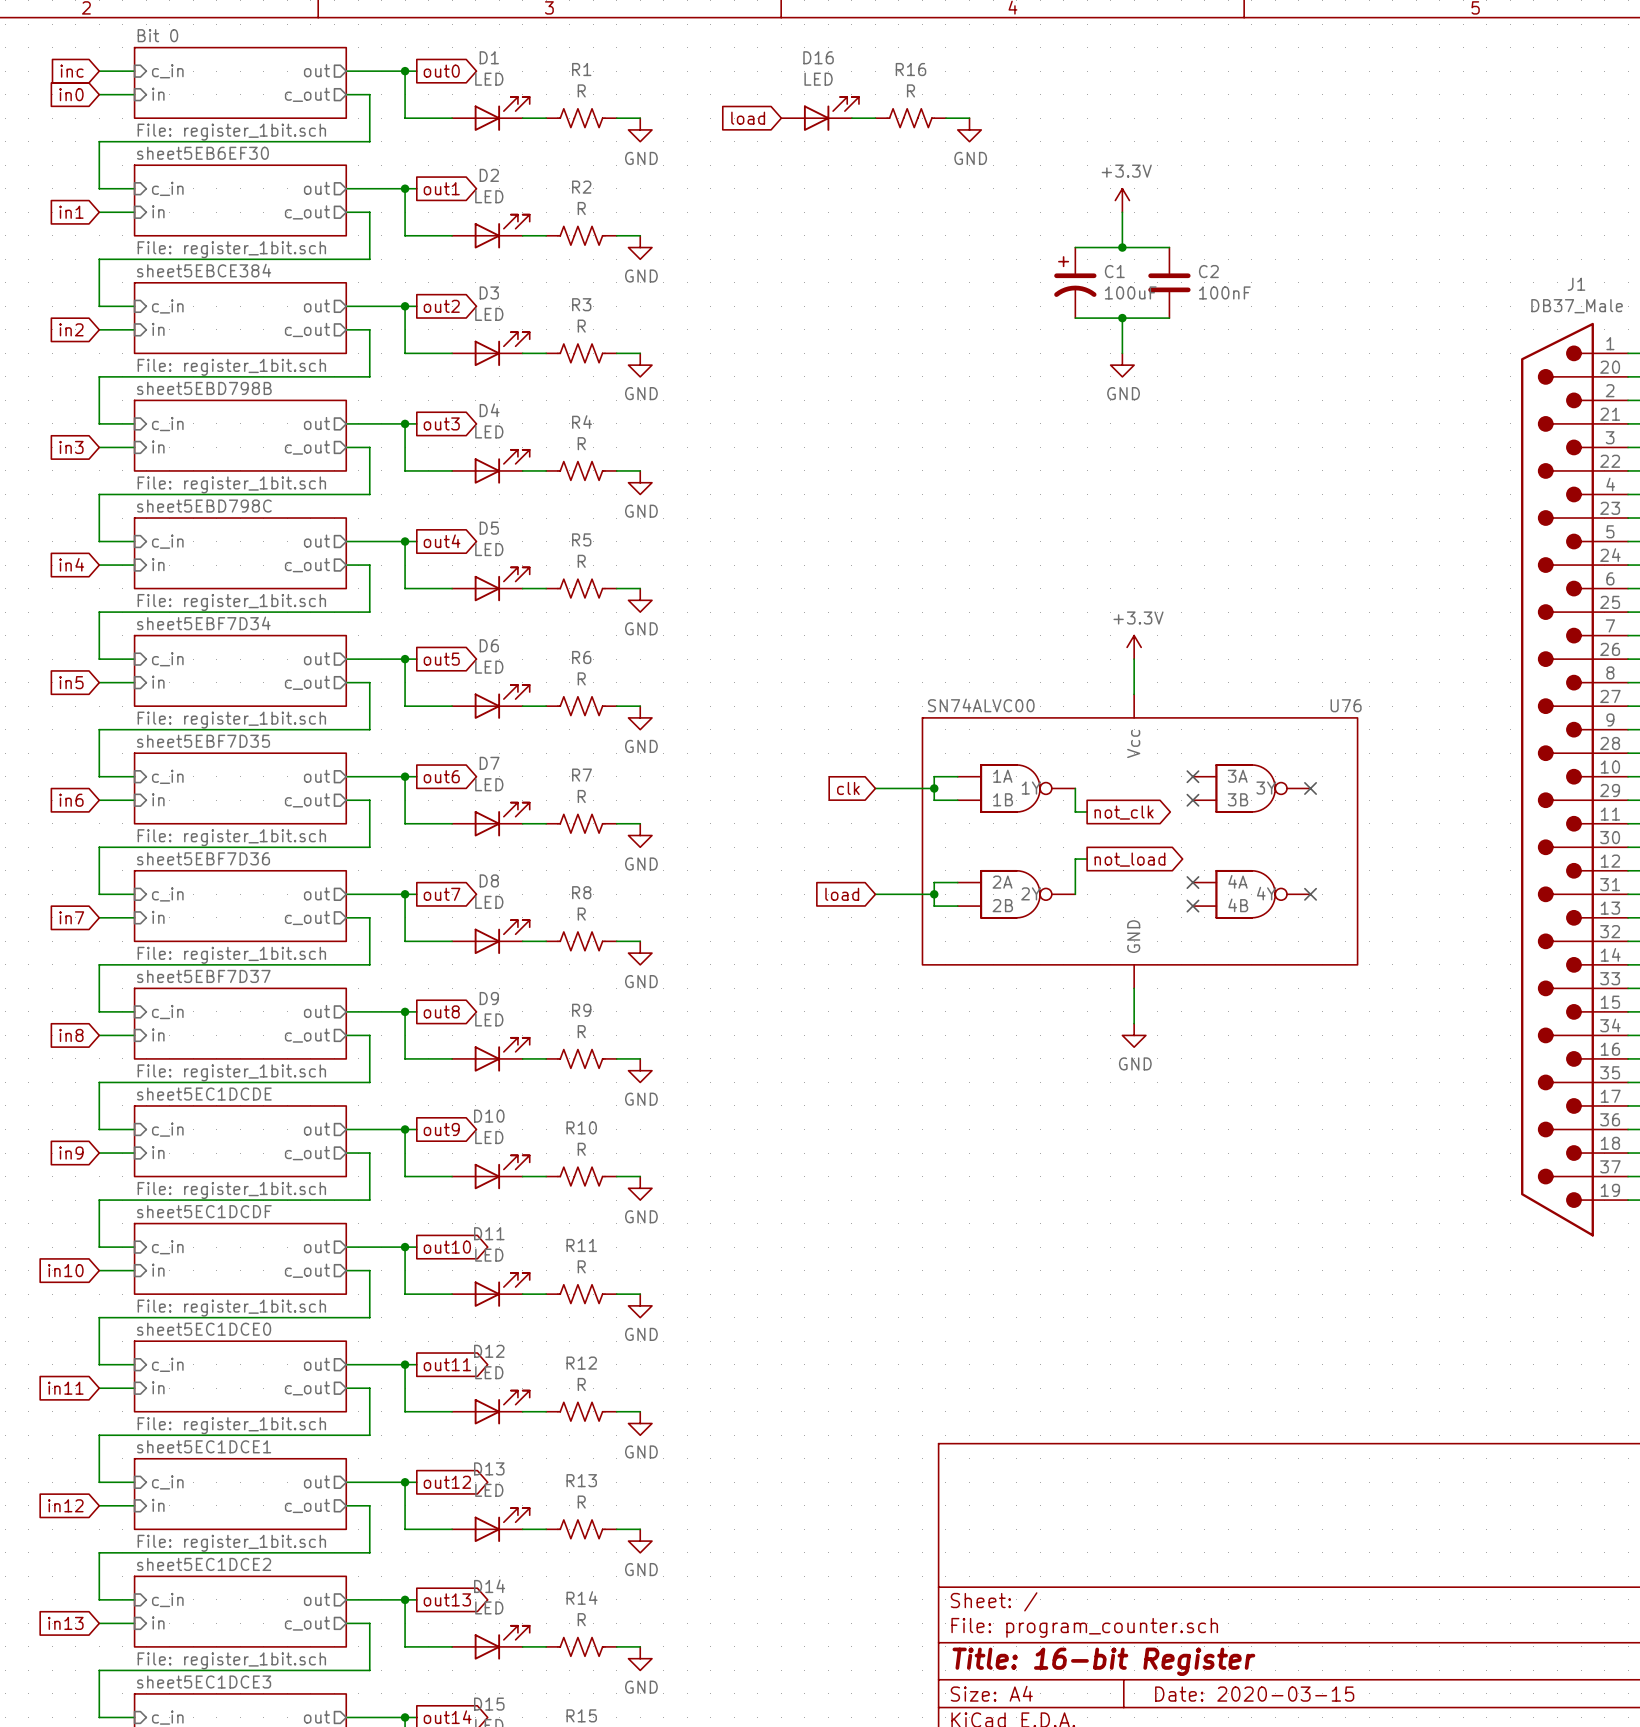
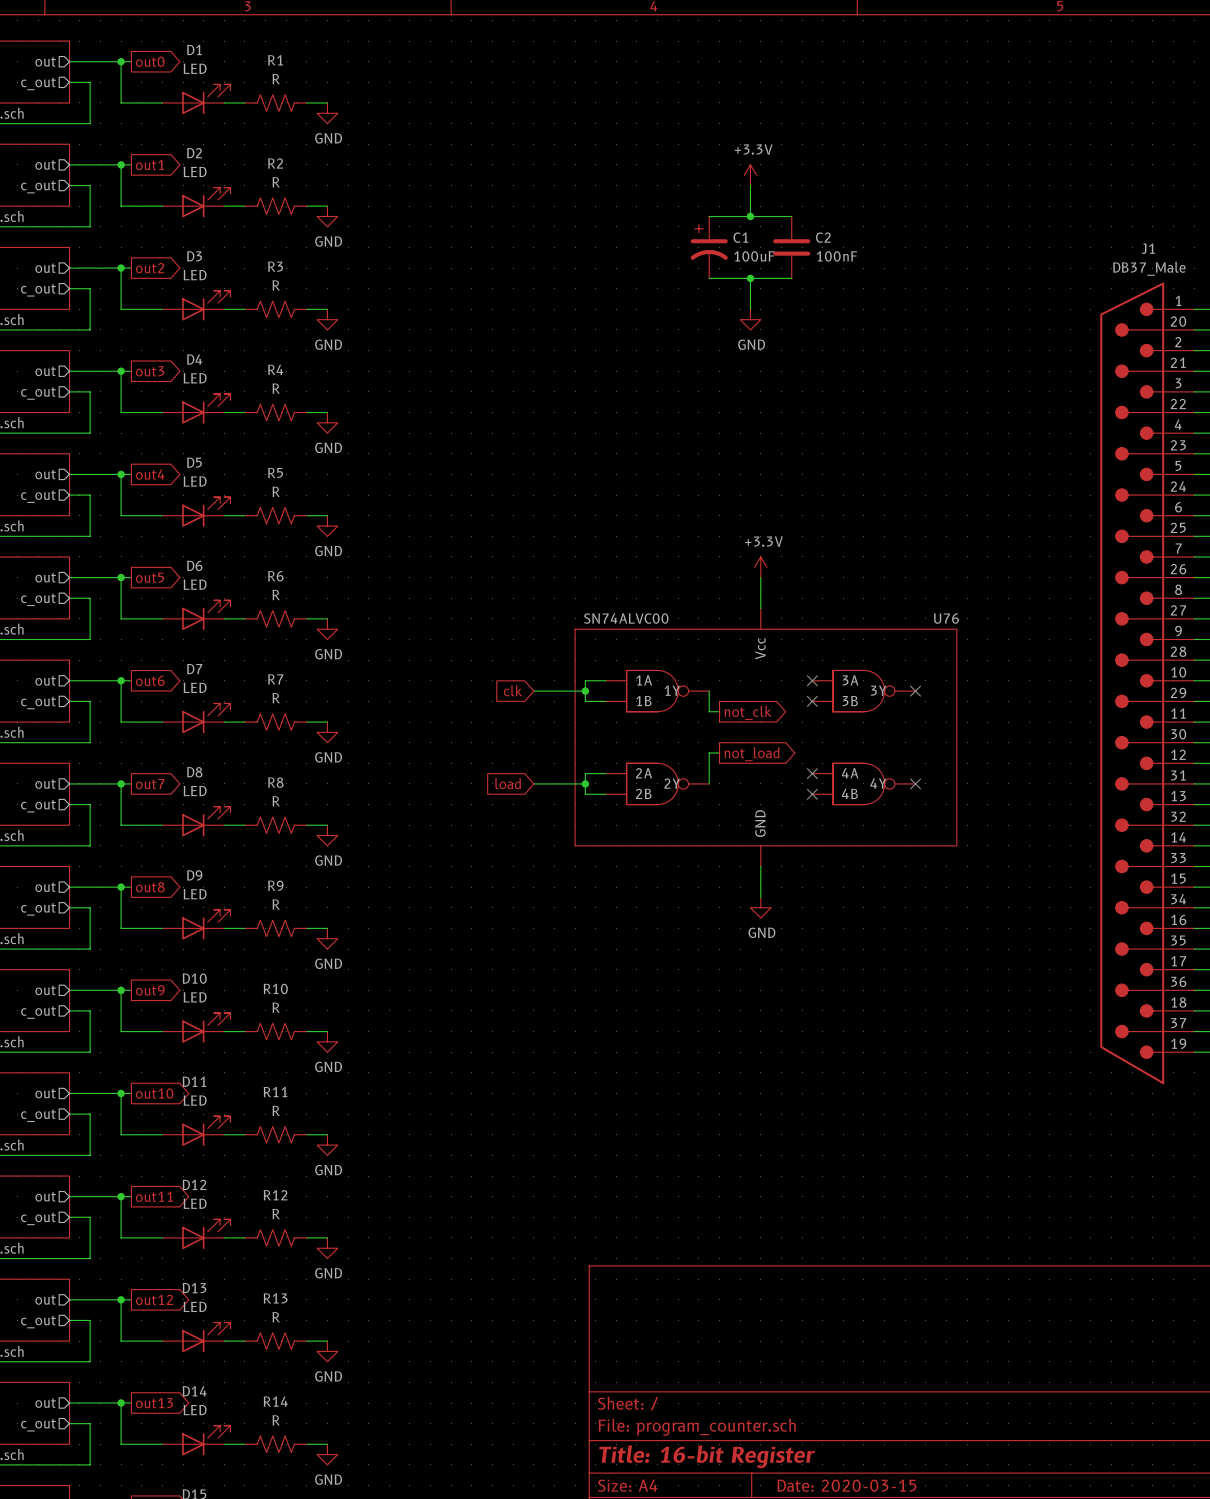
D16: LED (820, 113) -> none
global label: load (748, 118) -> none
wire: (851, 118) (875, 118) -> none
R16: R (910, 118) -> none
wire: (945, 118) (969, 118) -> none
power symbol: GND (969, 129) -> none

